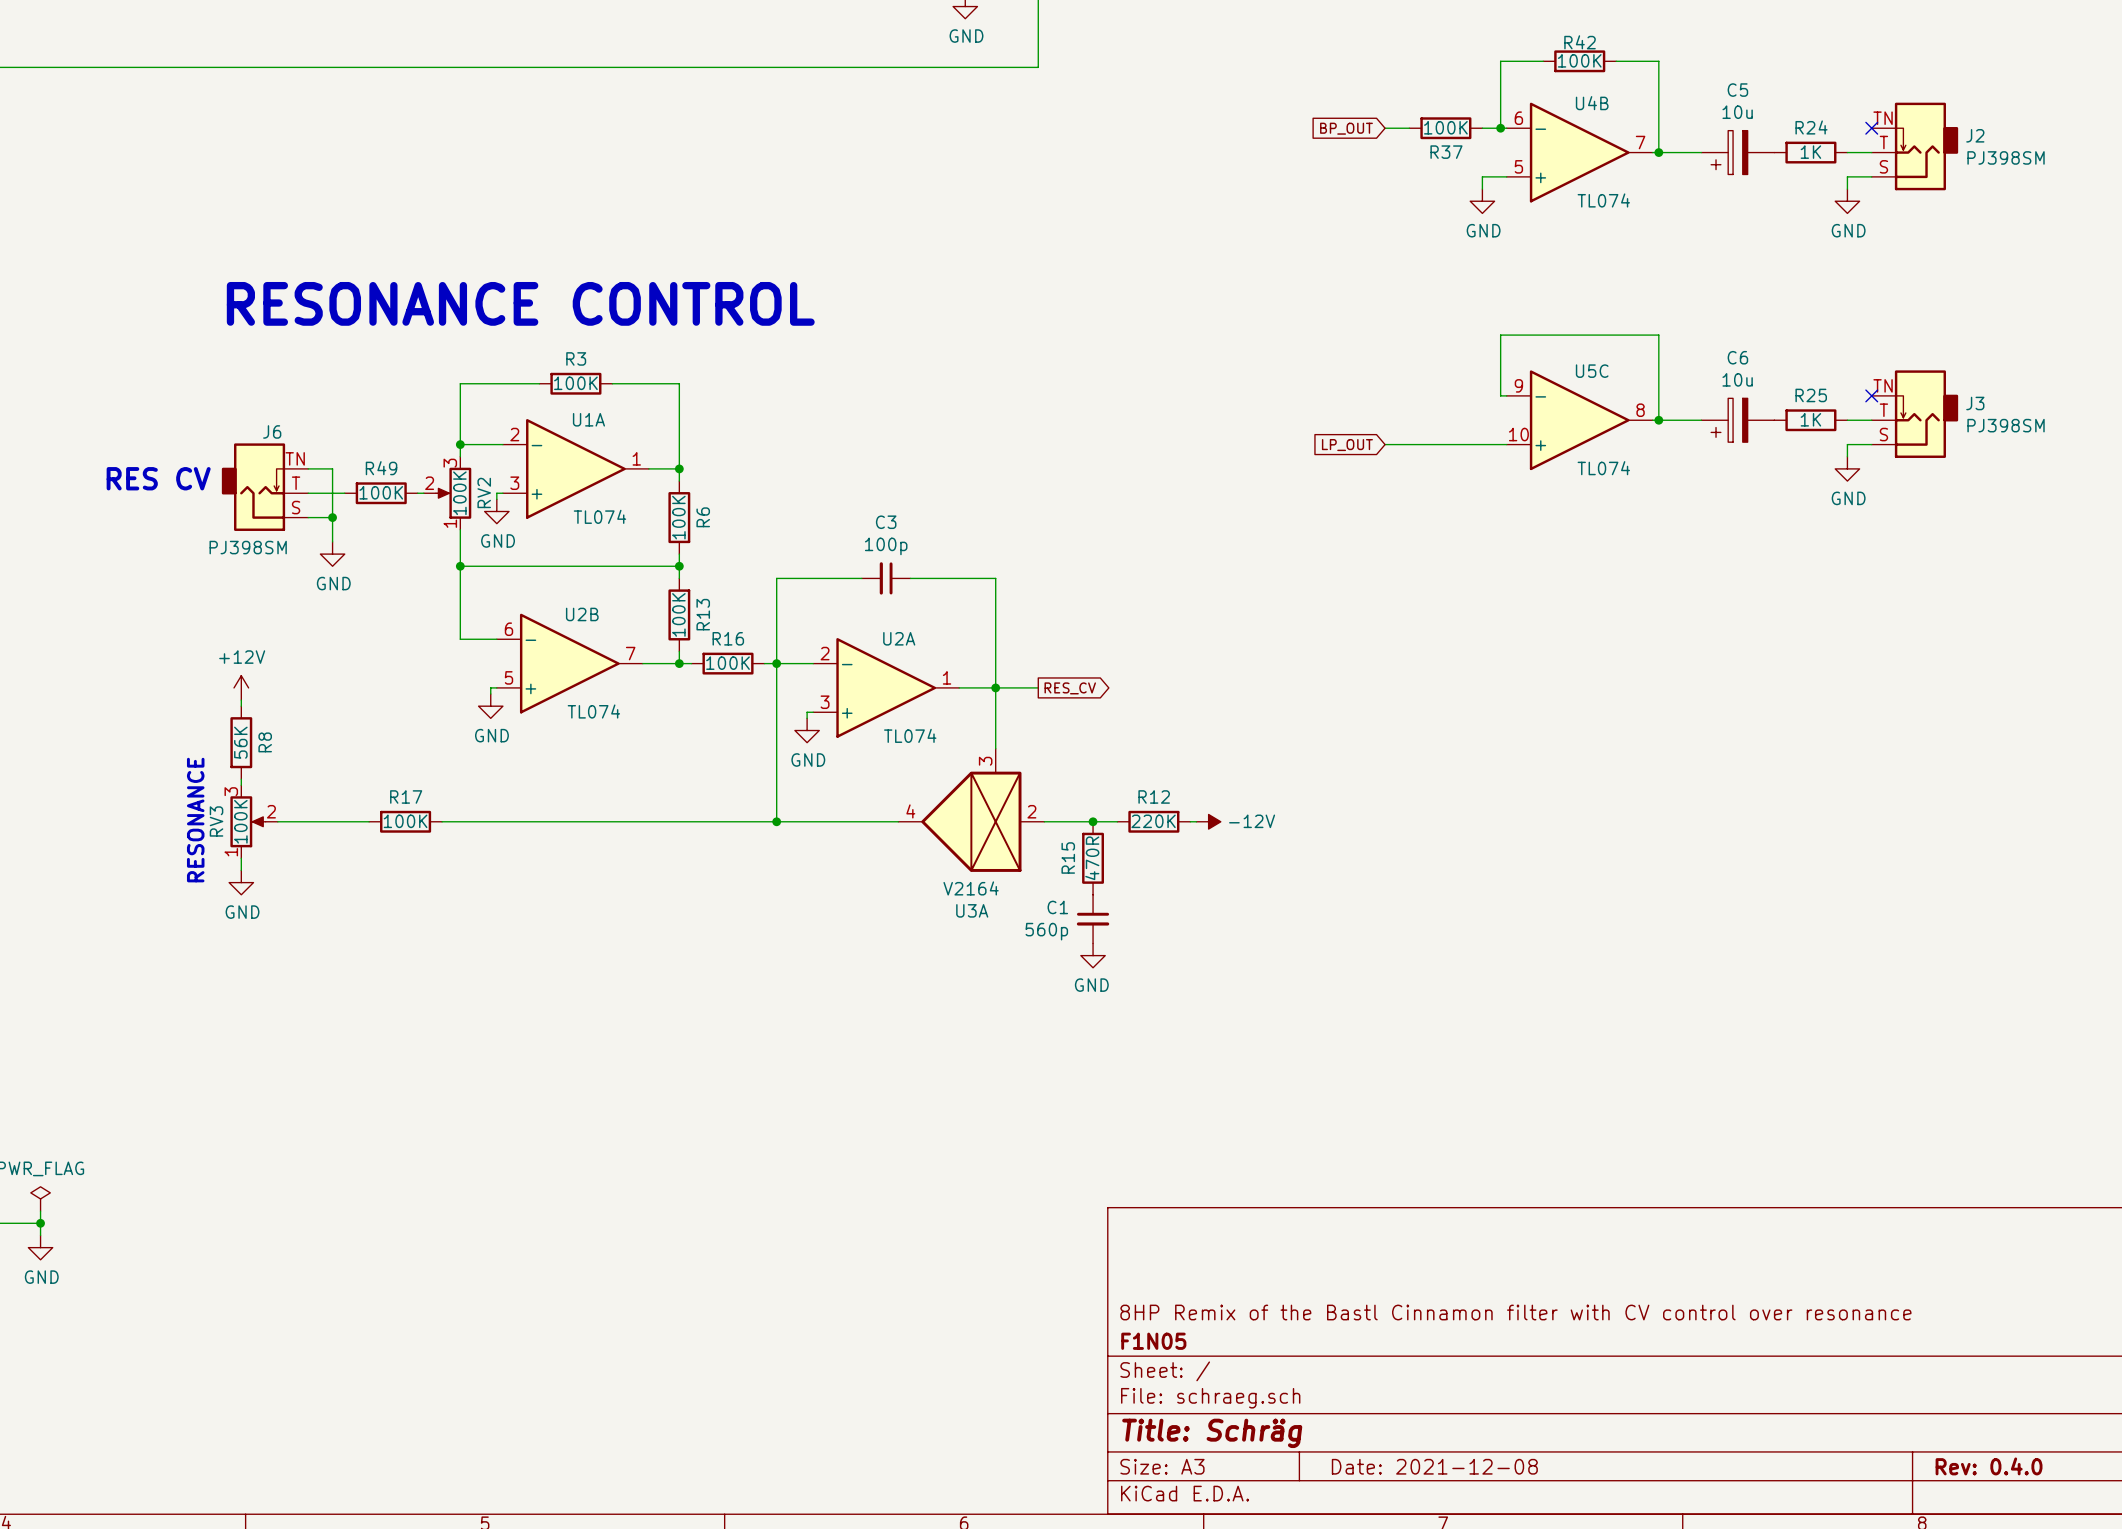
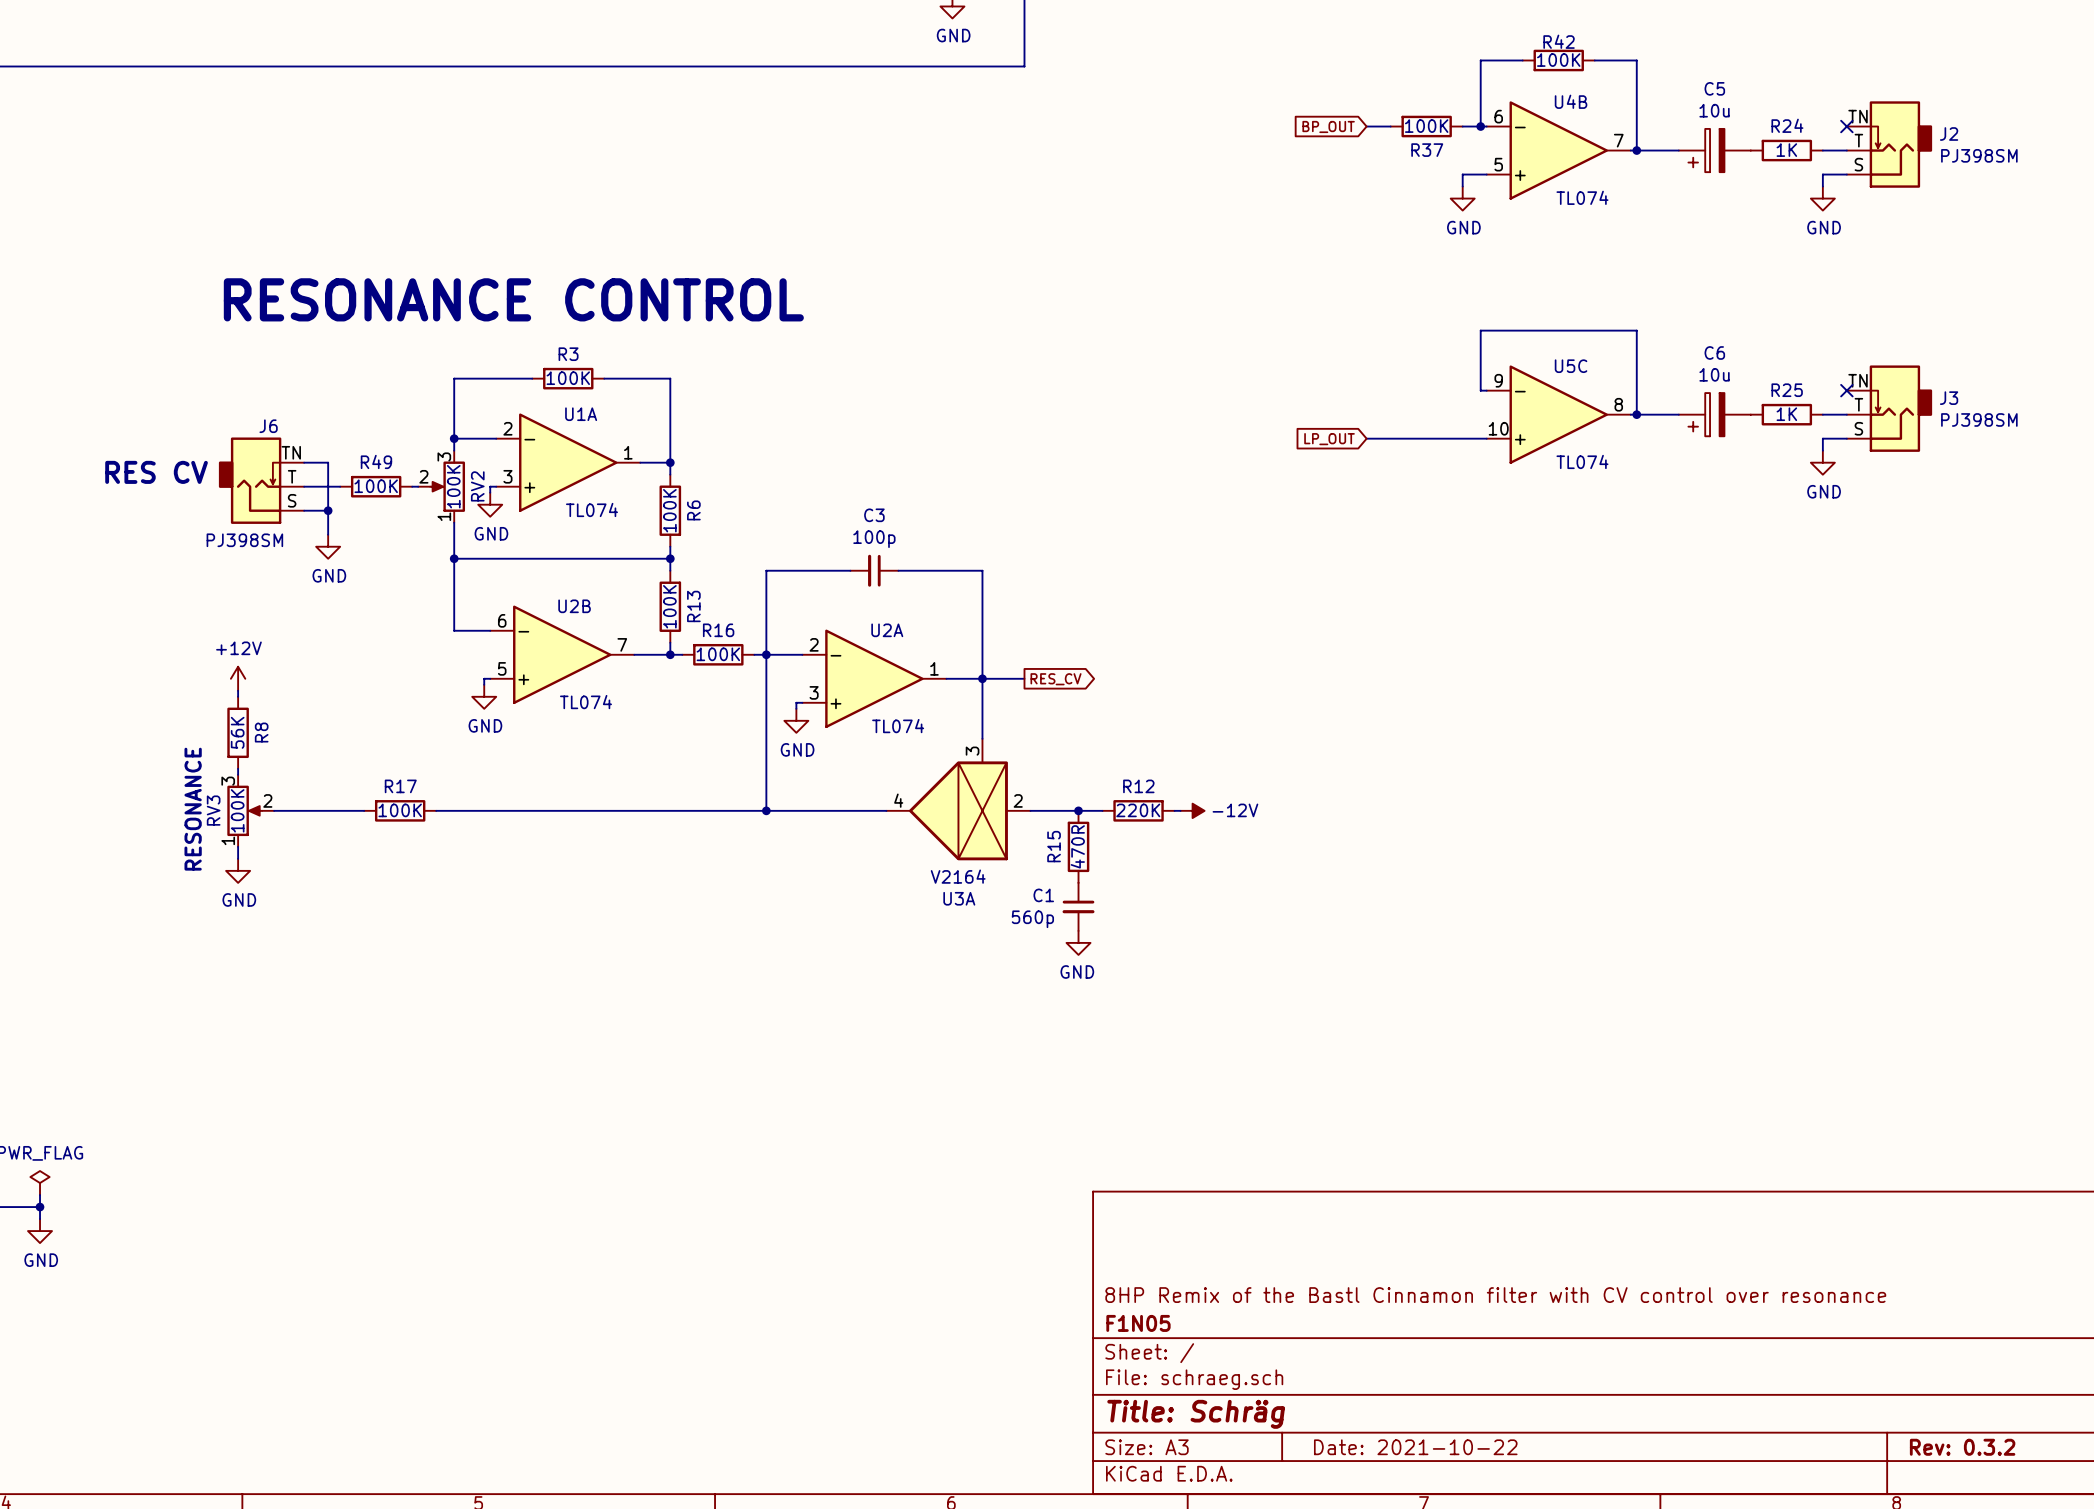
title block: Date: 2021-12-08 (1434, 1466) -> Date: 2021-10-22 (1415, 1447)
title block: Rev: 0.4.0 (1989, 1466) -> Rev: 0.3.2 (1962, 1447)

